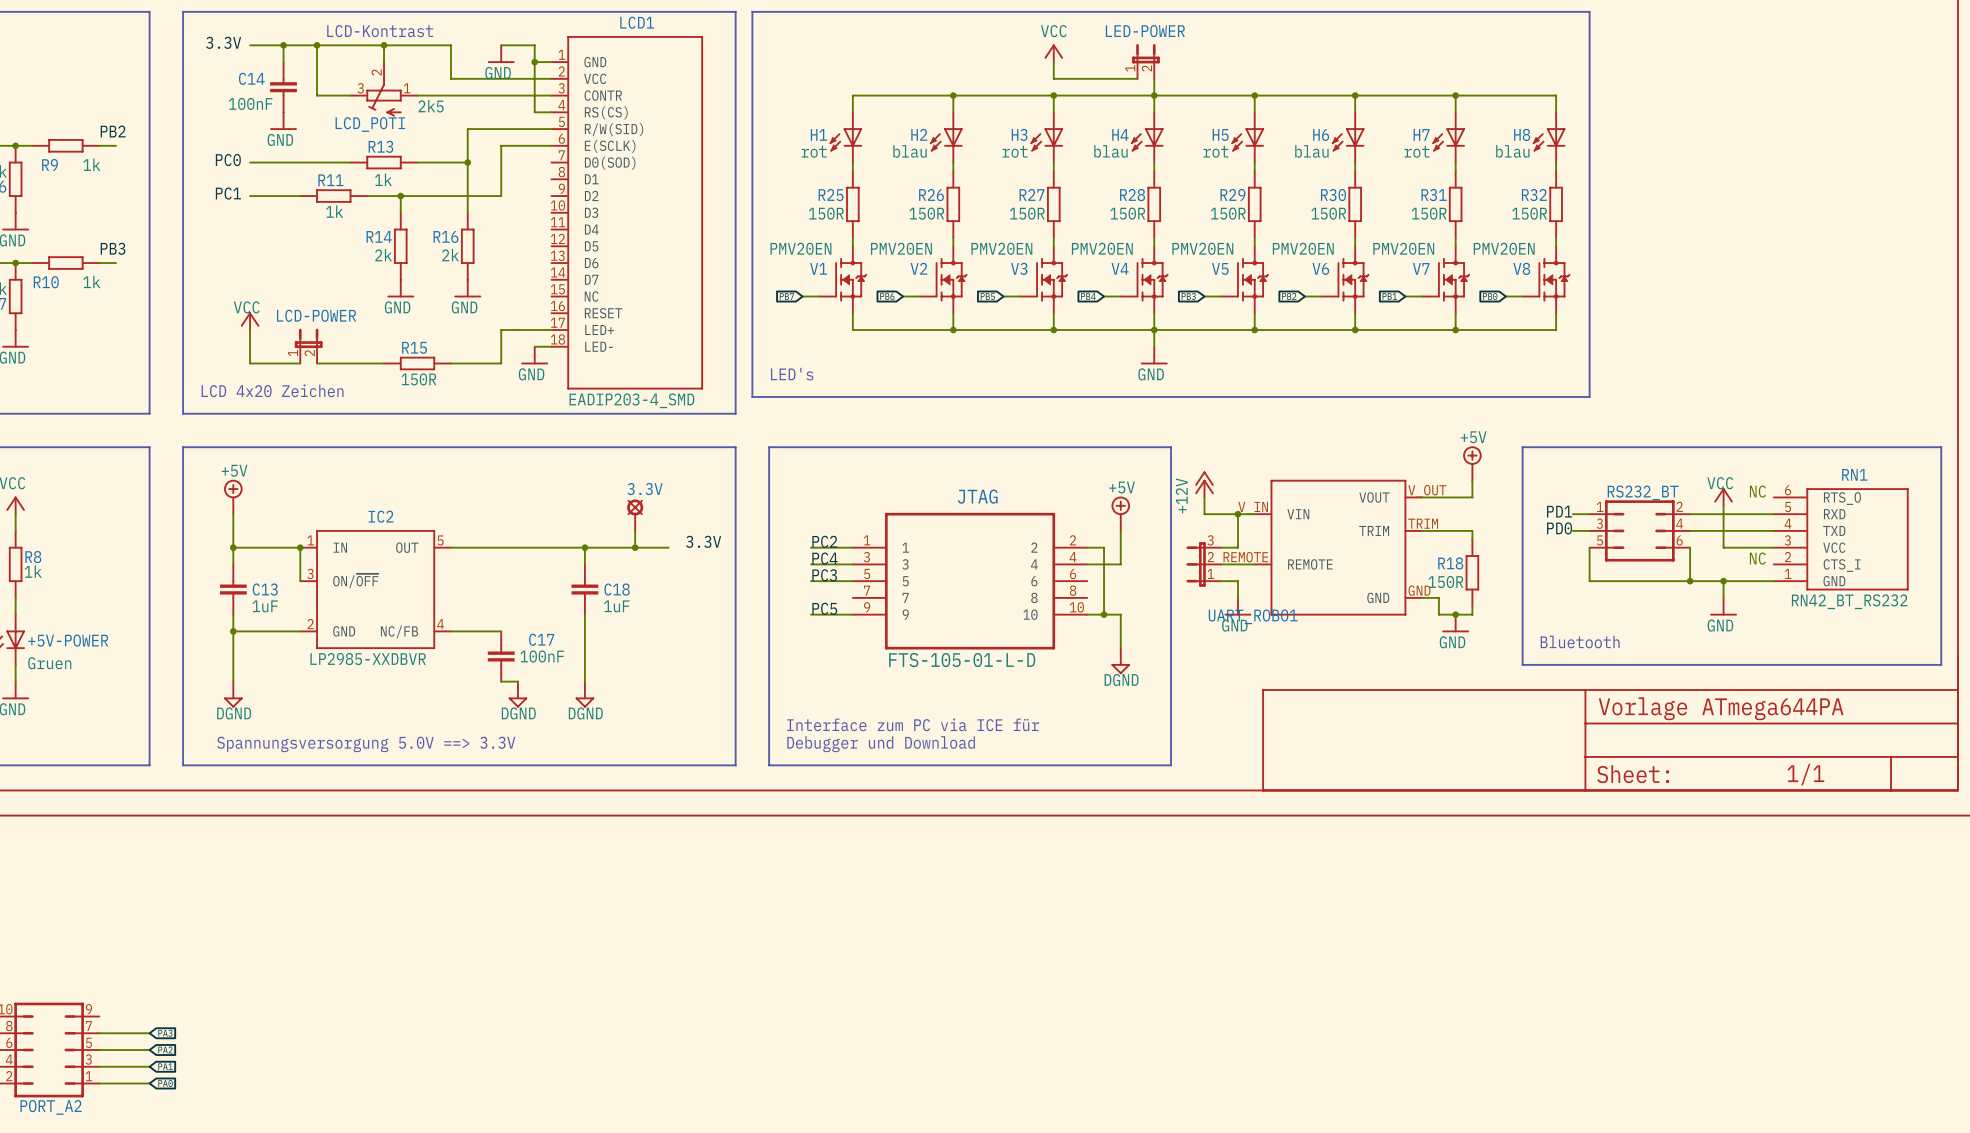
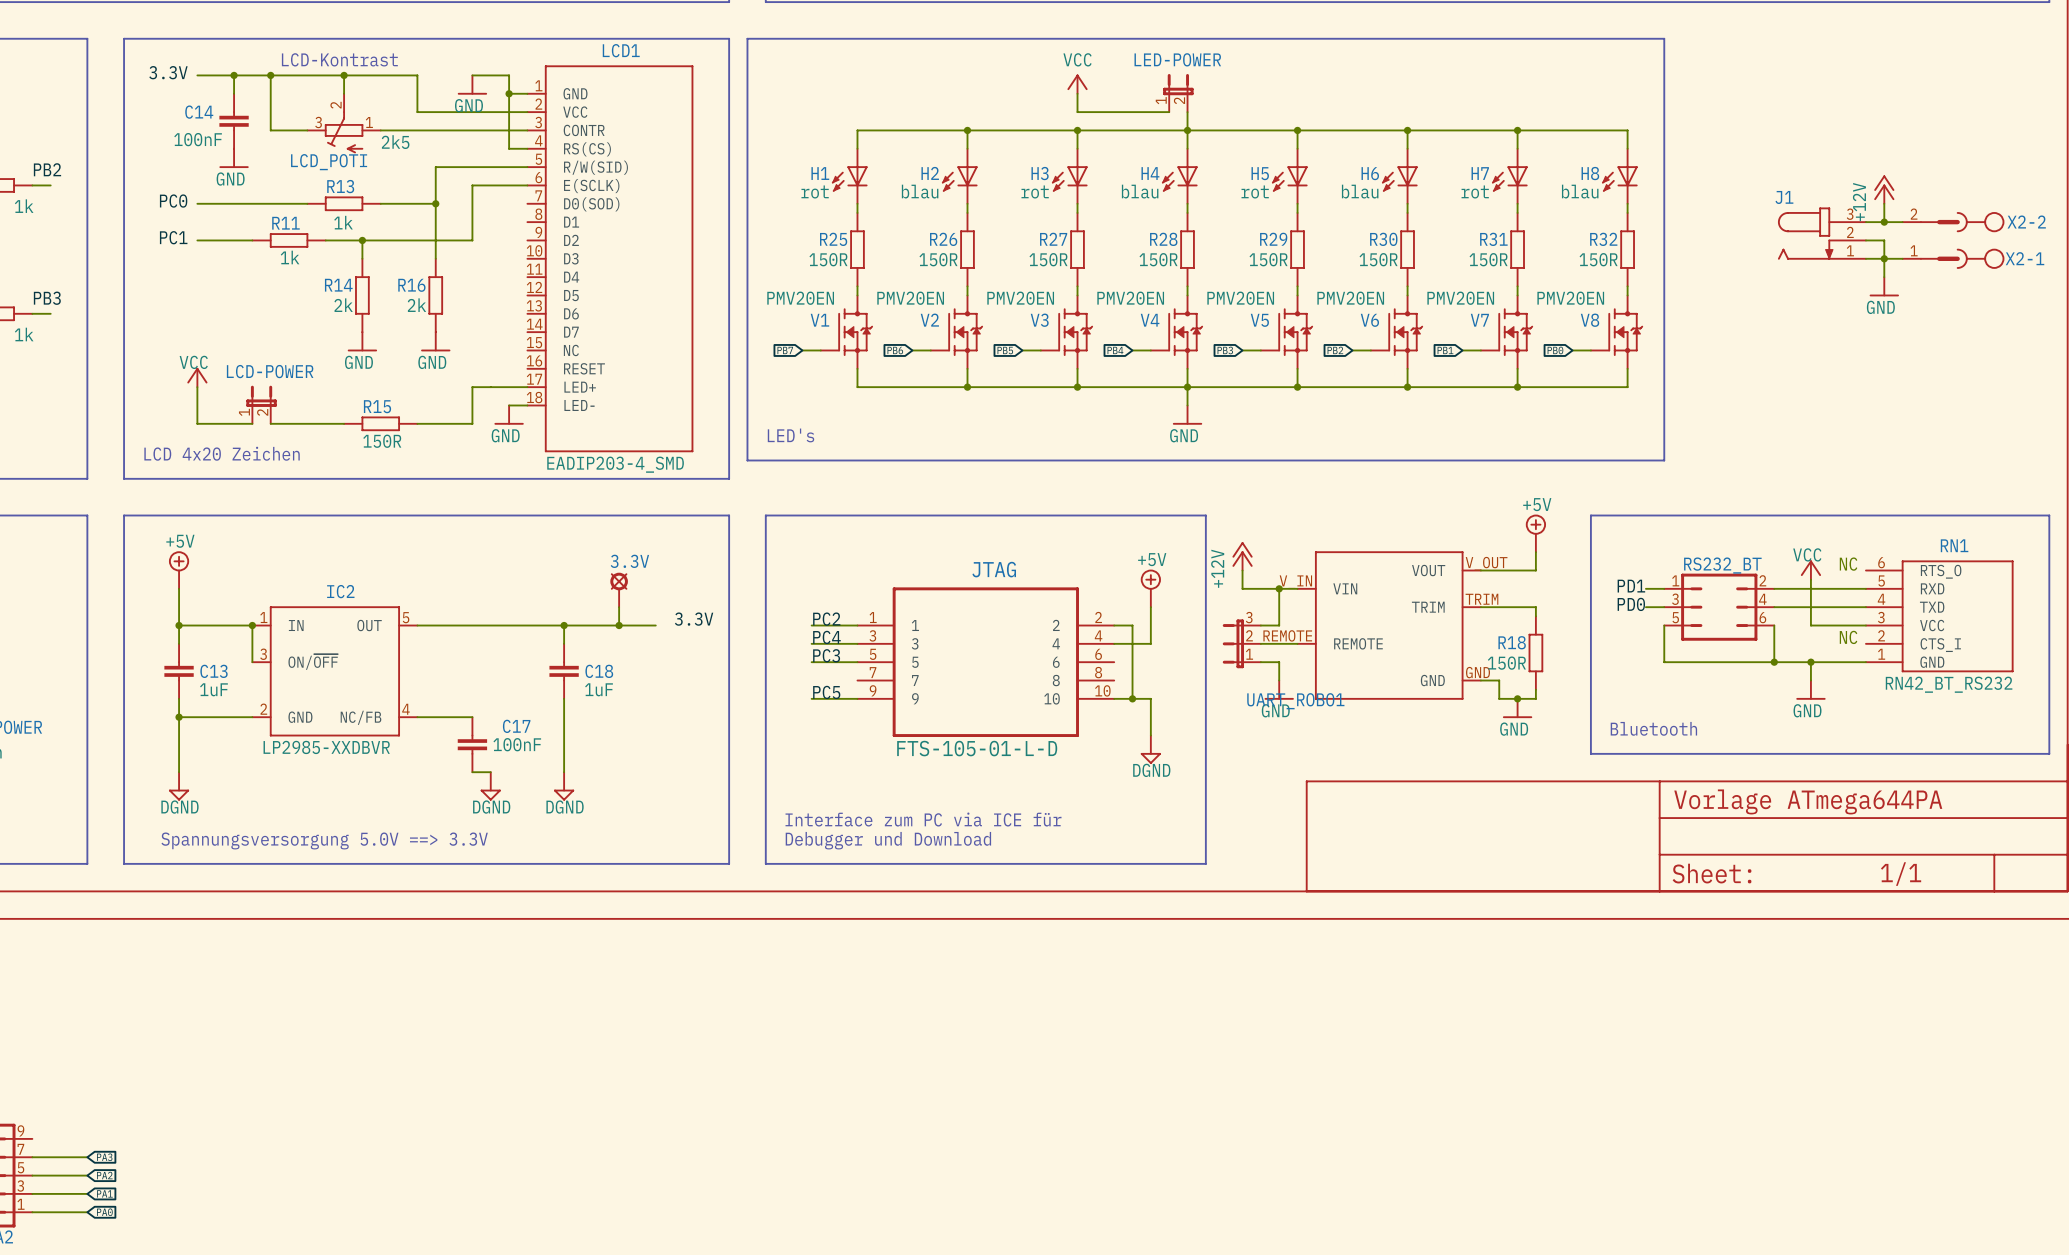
power symbol: none -> +12V (1884, 189)
wire: none -> (1884, 203) (1884, 222)
wire: none -> (1865, 222) (1902, 222)
junction: none -> (1884, 222)
X2-2: none -> (1953, 222)
J1: none -> (1822, 233)
wire: none -> (1865, 240) (1884, 240) (1884, 277)
wire: none -> (1865, 258) (1902, 258)
junction: none -> (1884, 258)
X2-1: none -> (1953, 258)
power symbol: none -> GND (1884, 286)

